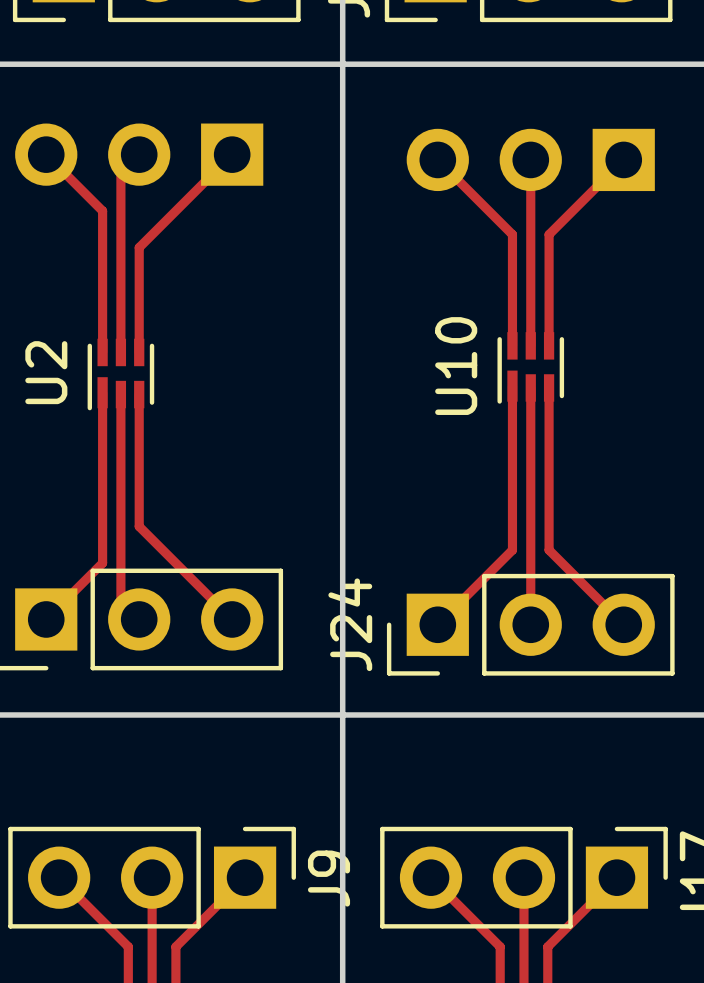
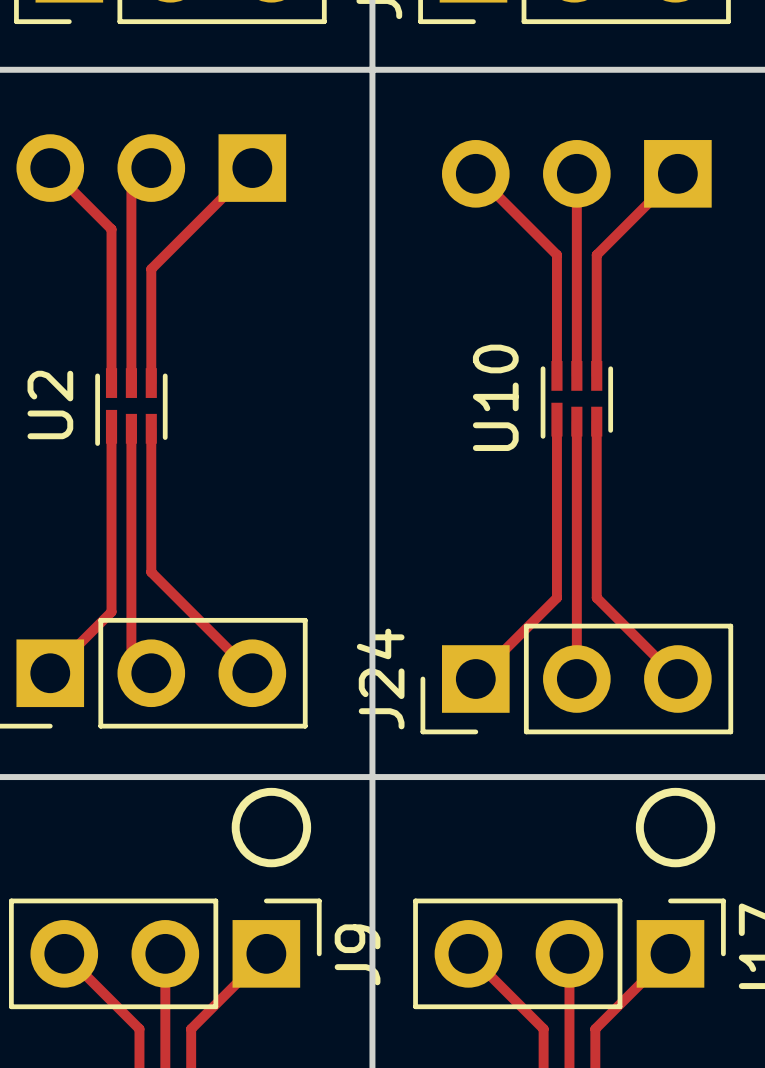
drawing: none -> [231, 787, 312, 868]
drawing: none -> [635, 787, 716, 868]

